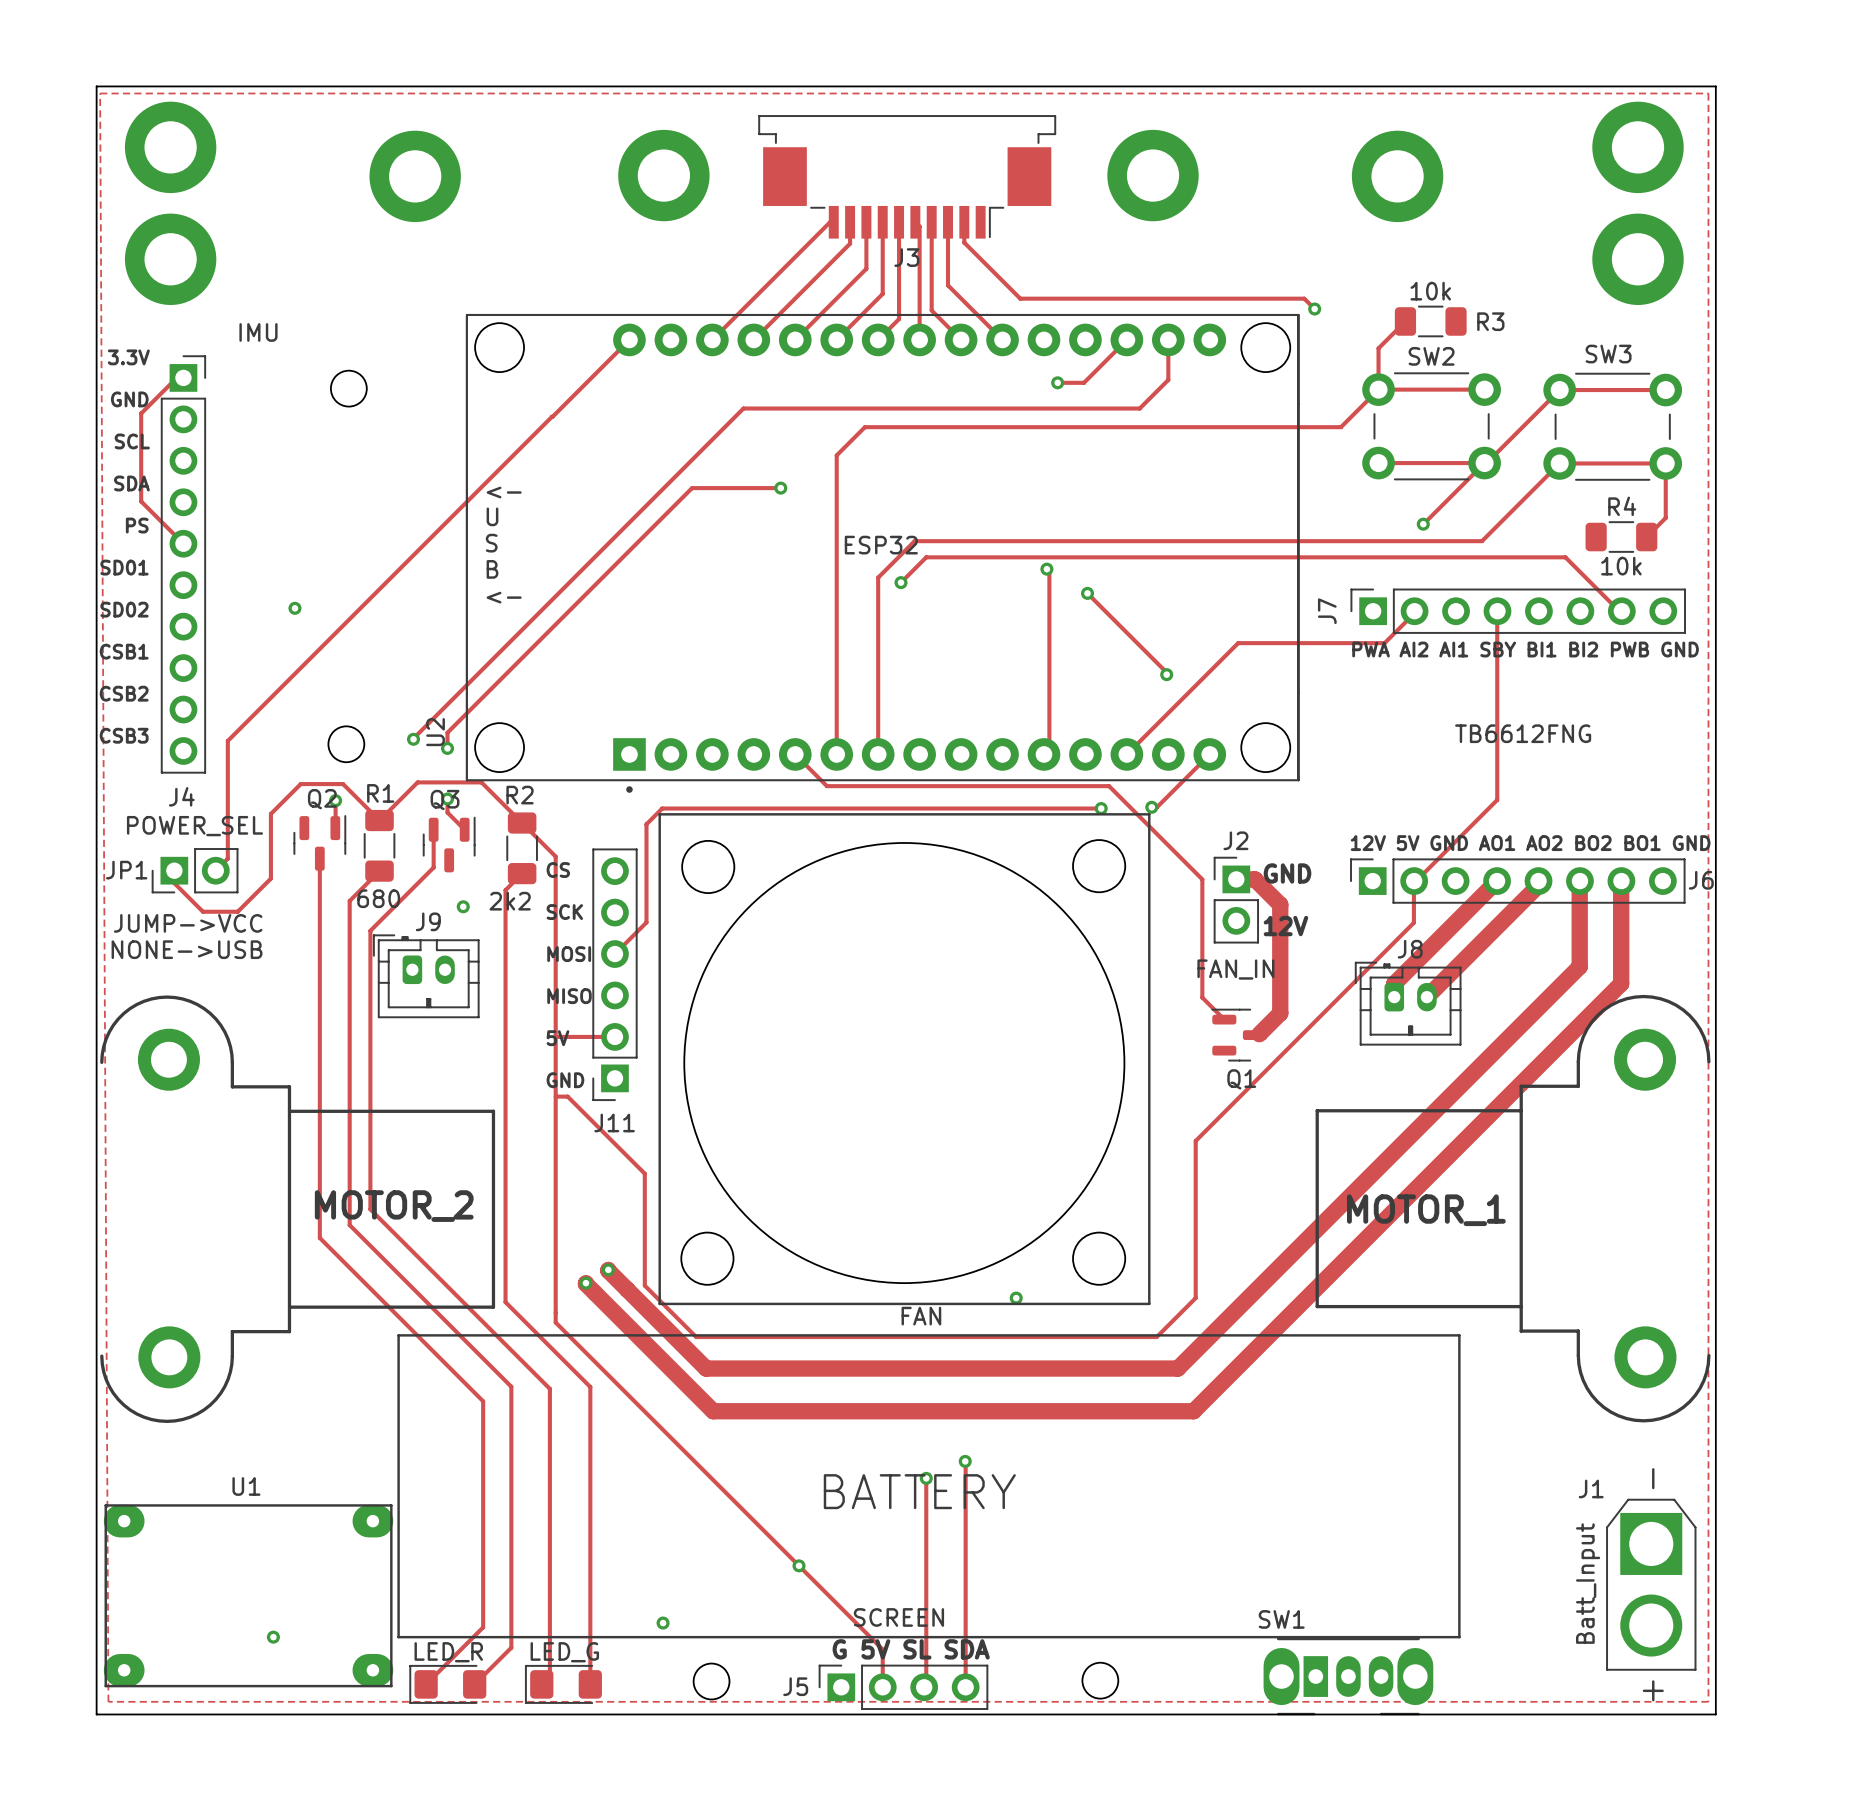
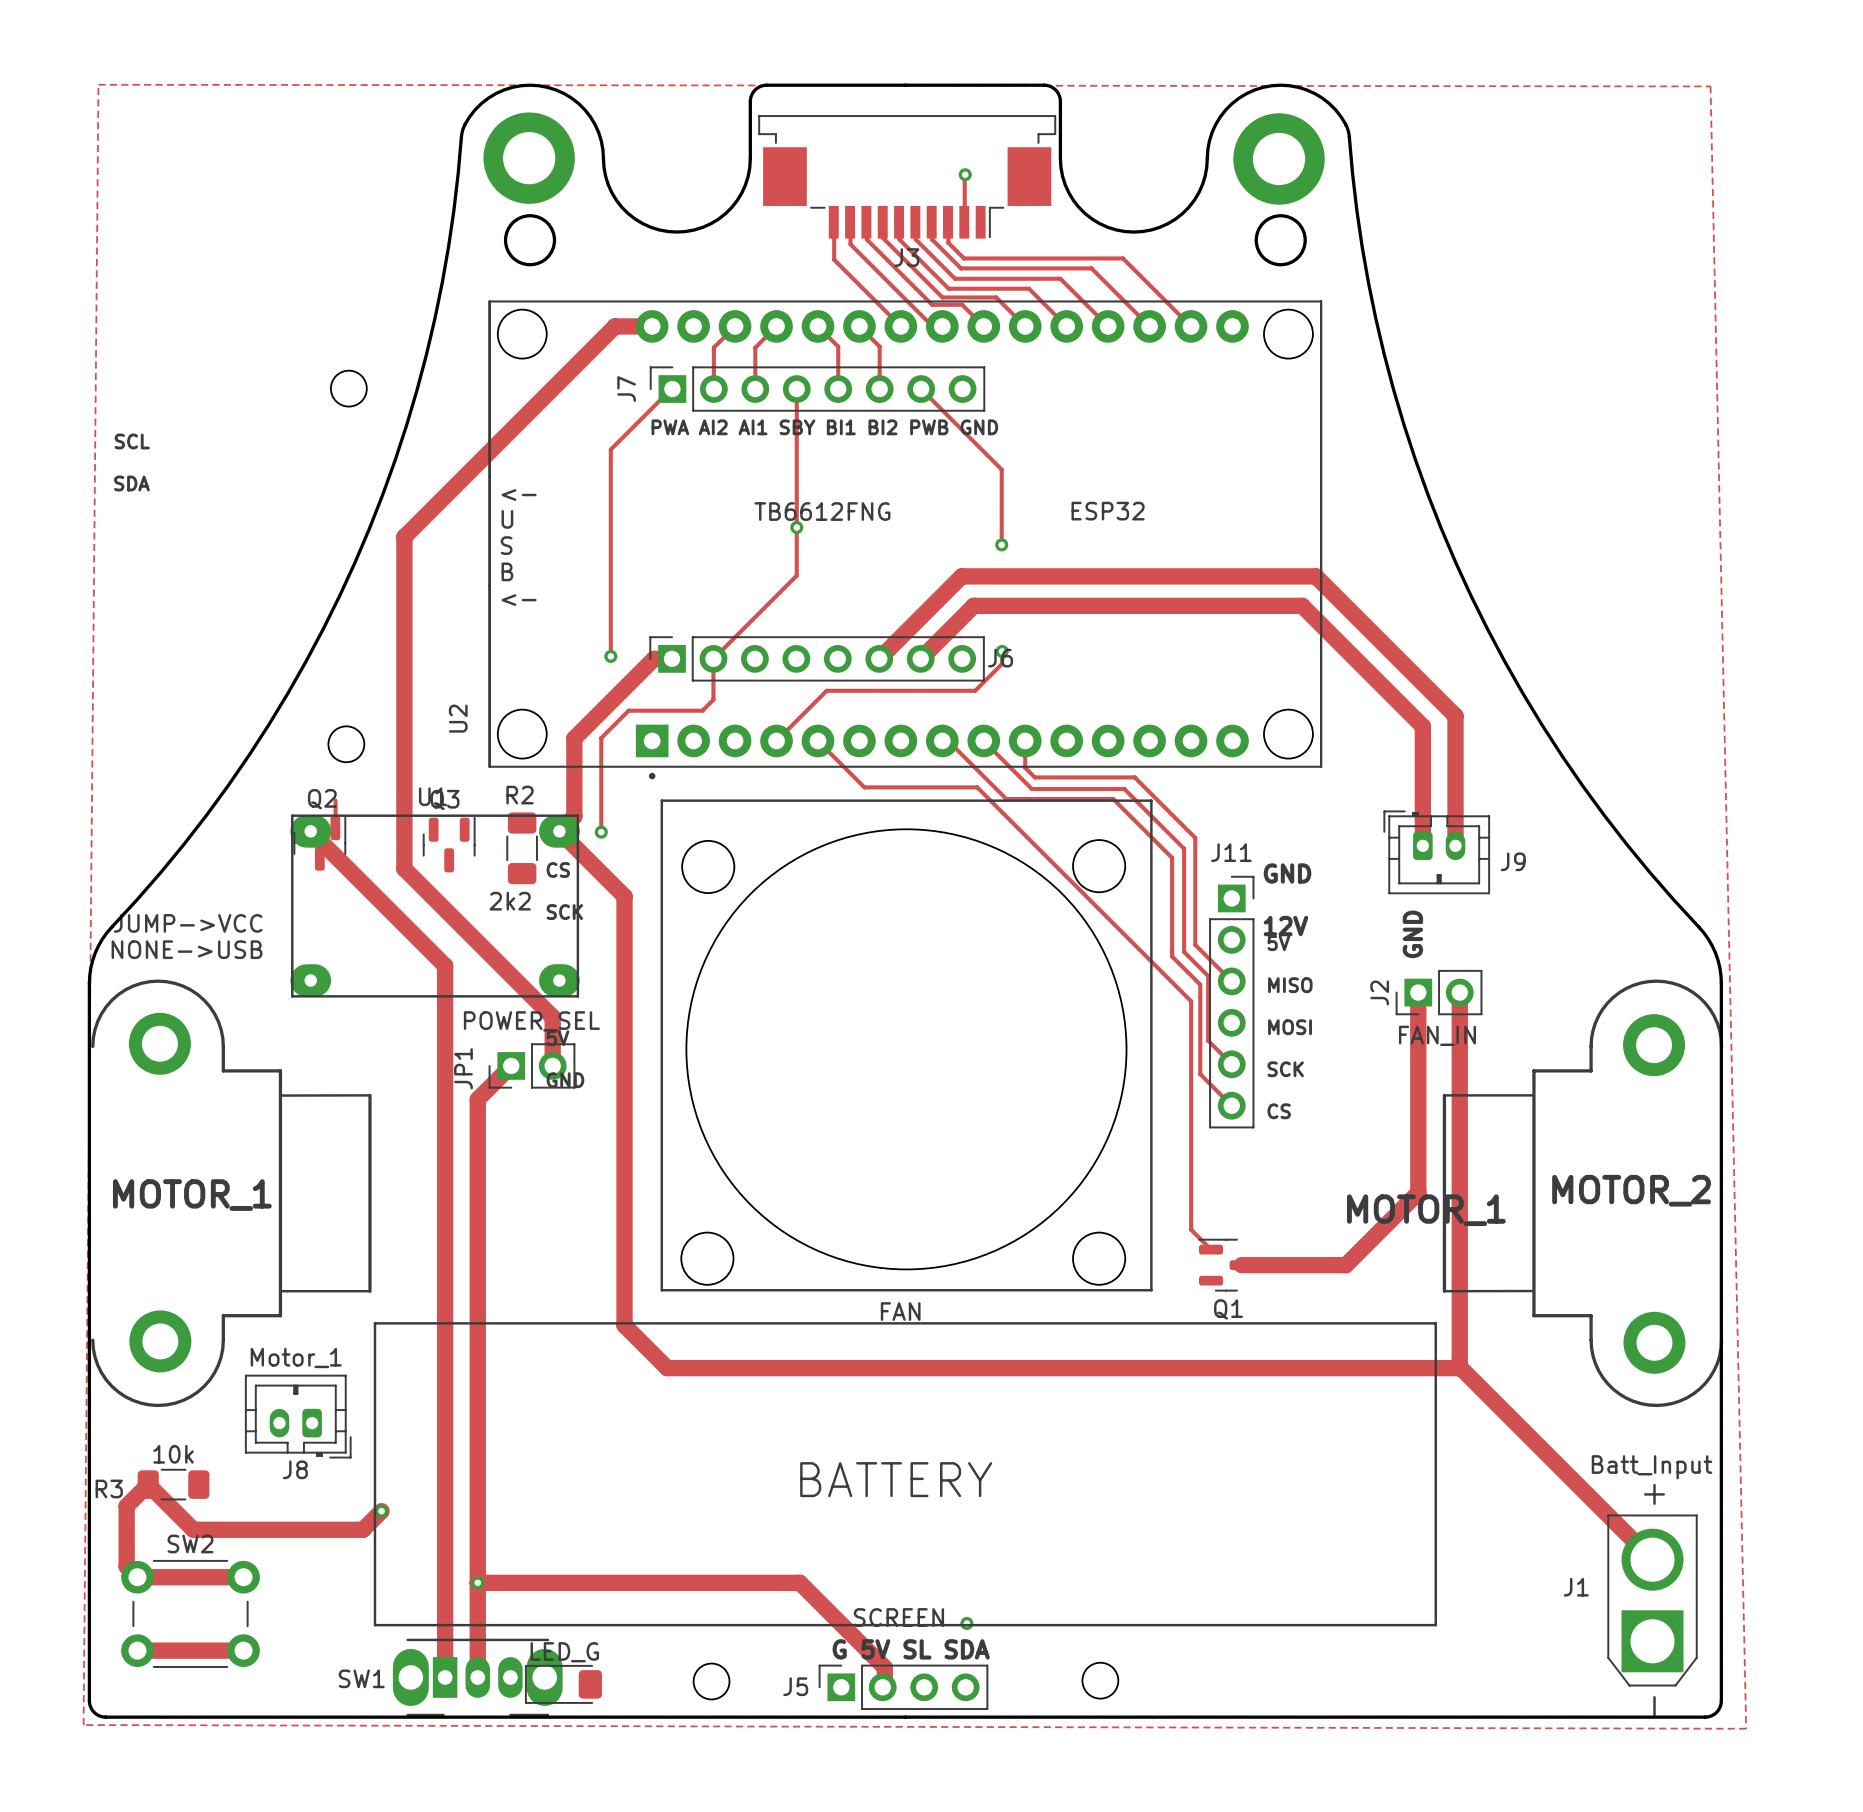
board edge: (96, 86) (1715, 86) (1715, 1714) (96, 1714) (96, 86) -> (766, 85) (756, 88) (750, 97) (749, 167) (741, 192) (731, 207) (718, 219) (702, 227) (685, 231) (668, 231) (650, 227) (635, 219) (621, 207) (608, 184) (601, 141) (595, 124) (578, 103) (564, 93) (538, 85) (512, 87) (488, 98) (469, 116) (461, 133) (448, 246) (426, 354) (395, 459) (355, 562) (306, 661) (249, 755) (184, 844) (106, 932) (95, 953) (89, 983) (89, 1700) (91, 1708) (97, 1714) (105, 1717) (1705, 1717) (1713, 1714) (1719, 1707) (1721, 1700) (1719, 967) (1715, 953) (1703, 932) (1626, 844) (1561, 755) (1504, 661) (1455, 562) (1415, 459) (1384, 354) (1362, 246) (1348, 133) (1345, 124) (1329, 103) (1306, 89) (1280, 85) (1263, 87) (1246, 93) (1231, 103) (1215, 124) (1209, 141) (1202, 184) (1188, 207) (1175, 219) (1159, 227) (1142, 231) (1124, 231) (1107, 227) (1092, 219) (1078, 207) (1068, 192) (1060, 167) (1060, 97) (1056, 91) (1049, 86) (766, 85)
zone outline: (100, 93) (108, 1701) (1708, 1701) (1708, 93) (100, 93) -> (98, 84) (83, 1725) (1746, 1728) (1710, 86) (98, 84)
part: (170, 147) -> none
part: (1638, 147) -> none
part: none -> (529, 158)
part: none -> (1279, 158)
track: none -> (965, 174) (964, 223)
via: none -> (965, 174)
part: (663, 175) -> none
part: (1153, 175) -> none
part: (415, 176) -> none
part: (1397, 176) -> none
round board edge: none -> [503, 214, 557, 267]
round board edge: none -> [1254, 214, 1307, 267]
track: (833, 222) (830, 222) (712, 339) -> none
track: (850, 222) (850, 243) (753, 339) -> none
track: (866, 222) (866, 268) (795, 339) -> none
track: (882, 222) (882, 293) (836, 339) -> none
track: (899, 222) (899, 319) (878, 339) -> none
track: (915, 222) (919, 226) (919, 339) -> none
track: (931, 222) (931, 310) (961, 339) -> none
track: (948, 222) (948, 285) (1002, 339) -> none
track: (964, 222) (964, 242) (1020, 298) (1304, 298) (1314, 309) -> none
track: none -> (834, 223) (834, 259) (900, 326)
track: none -> (850, 223) (850, 244) (932, 326) (942, 326)
track: none -> (866, 223) (866, 239) (932, 304) (962, 304) (983, 326)
track: none -> (883, 223) (883, 238) (942, 297) (996, 297) (1025, 326)
track: none -> (899, 223) (899, 239) (948, 288) (1028, 288) (1066, 326)
track: none -> (915, 223) (915, 239) (955, 278) (1060, 278) (1108, 326)
track: none -> (932, 223) (932, 239) (960, 268) (1091, 268) (1149, 326)
track: none -> (948, 223) (948, 242) (964, 258) (1123, 258) (1191, 326)
part: (170, 259) -> none
part: (1638, 259) -> none
via: (1314, 309) -> none
track: (1405, 321) (1378, 348) (1378, 389) -> none
R3 position: (1430, 321) -> (173, 1484)
R3 name position: R3 (1490, 321) -> R3 (109, 1488)
track: none -> (652, 326) (614, 326) (404, 537) (404, 868) (552, 1017) (552, 1065)
track: none -> (735, 326) (713, 347) (713, 389)
track: none -> (776, 326) (755, 347) (755, 389)
track: none -> (817, 326) (838, 346) (838, 389)
track: none -> (859, 326) (879, 346) (879, 389)
track: (629, 339) (227, 740) (227, 858) (215, 870) -> none
track: (1126, 339) (1084, 382) (1057, 382) -> none
track: (1168, 339) (1168, 379) (1139, 408) (743, 408) (413, 739) -> none
text: 3.3V (128, 357) -> none
track: (183, 377) (176, 377) (141, 413) (141, 501) (183, 543) -> none
via: (1057, 382) -> none
track: none -> (672, 389) (610, 449) (610, 656)
track: none -> (796, 389) (796, 575) (713, 658) (713, 699) (702, 710) (628, 710) (601, 738) (601, 832)
track: none -> (921, 389) (1001, 469) (1001, 544)
track: (1378, 389) (1340, 427) (864, 427) (836, 455) (836, 754) -> none
track: (1378, 389) (1484, 389) -> none
track: (1665, 390) (1559, 390) (1486, 463) (1378, 463) -> none
text: GND (129, 399) -> none
SW2 position: (1431, 426) -> (190, 1613)
SW3: (1612, 426) -> none
text: none -> PWA AI2 AI1 SBY BI1 BI2 PWB GND (824, 427)
track: (1484, 463) (1423, 524) -> none
track: (780, 488) (692, 488) (447, 732) (447, 748) -> none
via position: (780, 488) -> (796, 527)
text position: <- (504, 492) -> <- (519, 495)
text: none -> TB6612FNG (822, 511)
text position: U (492, 516) -> U (507, 519)
via: (1423, 524) -> none
text: PS (137, 525) -> none
R4: 10k (1621, 537) -> none
track: (1646, 537) (1665, 517) (1665, 463) (1559, 463) (1481, 541) (914, 541) (878, 577) (878, 754) -> none
text position: S (491, 543) -> S (506, 545)
via: none -> (1001, 544)
text position: ESP32 (881, 545) -> ESP32 (1108, 511)
U2 position: (882, 553) -> (905, 539)
J4: IMU (183, 564) -> none
text: SD01 (124, 567) -> none
text position: B (492, 569) -> B (507, 571)
track: (1046, 569) (1049, 571) (1049, 749) (1043, 754) -> none
via: (1046, 569) -> none
track: (900, 582) (926, 557) (1565, 557) (1621, 613) -> none
via: (900, 582) -> none
track: (1087, 593) (1166, 674) -> none
via: (1087, 593) -> none
text position: <- (504, 597) -> <- (519, 600)
via: (294, 608) -> none
text: SD02 (124, 609) -> none
J7 position: (1518, 611) -> (817, 389)
track: (1414, 613) (1384, 643) (1238, 643) (1126, 754) -> none
track: (1497, 613) (1497, 799) (1413, 883) (1413, 922) (1195, 1140) (1195, 1298) (1156, 1337) (696, 1337) (644, 1285) (644, 1173) (567, 1096) (555, 1096) -> none
text: PWA AI2 AI1 SBY BI1 BI2 PWB GND (1525, 649) -> none
text: CSB1 (124, 651) -> none
track: none -> (1002, 651) (1002, 663) (975, 690) (826, 690) (776, 740)
via: none -> (1002, 651)
via: none -> (610, 656)
track: none -> (672, 658) (653, 658) (574, 738) (574, 816) (559, 831) (624, 896) (624, 1325) (667, 1368) (1459, 1366)
track: none -> (879, 658) (961, 576) (1315, 576) (1455, 715) (1455, 845)
track: none -> (920, 658) (973, 605) (1302, 605) (1422, 726) (1422, 845)
via: (1166, 674) -> none
text: CSB2 (124, 693) -> none
text: TB6612FNG (1523, 733) -> none
text: CSB3 (124, 735) -> none
via: (413, 739) -> none
track: none -> (817, 740) (864, 787) (977, 787) (1191, 1001) (1191, 1229) (1211, 1249)
track: none -> (942, 740) (948, 740) (1006, 798) (1113, 798) (1172, 857) (1172, 956) (1200, 984) (1200, 1074) (1231, 1105)
track: none -> (983, 740) (1031, 789) (1124, 789) (1184, 848) (1184, 951) (1208, 975) (1208, 1040) (1231, 1064)
track: none -> (1025, 740) (1025, 767) (1034, 777) (1134, 777) (1195, 837) (1195, 944) (1231, 981)
via: (447, 748) -> none
track: (795, 754) (826, 786) (1109, 786) (1202, 879) (1202, 997) (1224, 1019) -> none
track: (1209, 754) (1156, 807) (1151, 807) -> none
track: (447, 798) (447, 812) (464, 829) -> none
via: (447, 798) -> none
via: (335, 800) -> none
via: (1151, 807) -> none
track: (1101, 808) (662, 808) (646, 824) (646, 922) (614, 954) -> none
via: (1101, 808) -> none
line: (659, 814) (1149, 814) (1149, 1303) (659, 1303) (659, 814) -> (661, 800) (1151, 800) (1151, 1290) (661, 1290) (661, 800)
track: (433, 829) (433, 867) (370, 930) (370, 1209) (549, 1388) (549, 1676) (541, 1684) -> none
track: none -> (310, 831) (445, 965) (445, 1677)
via: none -> (601, 832)
text: 12V 5V GND AO1 AO2 BO2 BO1 GND (1530, 843) -> none
R1: 680 (379, 845) -> none
track: (319, 858) (319, 1237) (483, 1401) (483, 1627) (426, 1684) -> none
JP1 name rotation: 0° (126, 870) -> 90° counterclockwise (463, 1068)
track: (174, 870) (174, 883) (202, 911) (237, 911) (270, 878) (270, 813) (300, 784) (343, 784) (379, 820) (417, 782) (481, 782) (555, 856) (555, 1322) (882, 1649) (882, 1687) -> none
JP1 position: (195, 870) -> (531, 1065)
track: (379, 871) (349, 900) (349, 1225) (511, 1386) (511, 1647) (474, 1684) -> none
track: (522, 873) (505, 890) (505, 1302) (590, 1387) (590, 1684) -> none
track: (1236, 879) (1254, 879) (1280, 904) (1280, 1013) (1259, 1034) (1254, 1035) -> none
track: (1497, 881) (1394, 983) (1394, 997) -> none
J6 position: (1517, 881) -> (817, 658)
track: (1538, 881) (1538, 885) (1426, 997) -> none
track: (1579, 883) (1579, 966) (1177, 1368) (706, 1368) (608, 1269) -> none
track: (1621, 883) (1621, 983) (1193, 1411) (713, 1411) (585, 1283) -> none
J2 rotation: 0° (1236, 900) -> 90° counterclockwise (1439, 992)
J2 position: (1236, 900) -> (1439, 992)
via: (463, 906) -> none
J9 name position: J9 (428, 921) -> J9 (1513, 861)
text: none -> GND (1412, 934)
text: none -> 5V (1278, 943)
text: MOSI (569, 954) -> none
J11 rotation: 0° (614, 974) -> 180° (1231, 1002)
J11 position: (614, 974) -> (1231, 1002)
J9 position: (426, 976) -> (1436, 852)
text: none -> MISO (1290, 985)
track: none -> (1418, 992) (1418, 1192) (1345, 1265) (1241, 1265)
track: none -> (1459, 992) (1459, 1366)
text: MISO (569, 996) -> none
J8 rotation: 0° (1408, 1003) -> 180° (298, 1416)
J8 position: (1408, 1003) -> (298, 1416)
text: none -> MOSI (1290, 1027)
Q1 position: (1239, 1035) -> (1225, 1265)
track: (557, 1036) (614, 1036) -> none
line: none -> (92, 1046) (95, 1029) (101, 1013) (118, 994) (141, 983) (166, 981) (183, 986) (197, 994) (214, 1013) (222, 1037) (223, 1070) (280, 1070) (280, 1315) (223, 1315) (222, 1348) (214, 1372) (197, 1391) (183, 1400) (166, 1404) (141, 1403) (118, 1391) (101, 1372) (95, 1357) (92, 1340)
line: none -> (1721, 1046) (1719, 1030) (1714, 1016) (1699, 997) (1679, 985) (1664, 981) (1648, 981) (1626, 988) (1613, 997) (1602, 1009) (1592, 1030) (1591, 1070) (1533, 1070) (1533, 1315) (1591, 1315) (1592, 1355) (1602, 1377) (1613, 1389) (1626, 1397) (1648, 1404) (1671, 1403) (1686, 1397) (1699, 1389) (1714, 1370) (1719, 1355) (1721, 1340)
part position: (168, 1059) -> (159, 1043)
part position: (1645, 1059) -> (1654, 1045)
line: (1708, 1061) (1703, 1036) (1689, 1015) (1676, 1005) (1660, 998) (1635, 997) (1610, 1005) (1597, 1015) (1587, 1029) (1578, 1053) (1578, 1086) (1521, 1086) (1521, 1331) (1578, 1331) (1578, 1364) (1587, 1388) (1597, 1401) (1610, 1412) (1635, 1420) (1660, 1418) (1683, 1407) (1700, 1388) (1706, 1372) (1708, 1355) -> none
line: (101, 1062) (106, 1039) (113, 1025) (123, 1013) (143, 1001) (159, 997) (174, 997) (197, 1004) (210, 1013) (220, 1025) (230, 1046) (232, 1086) (289, 1086) (289, 1331) (232, 1331) (230, 1371) (220, 1393) (210, 1404) (197, 1413) (174, 1420) (159, 1420) (143, 1417) (123, 1404) (109, 1386) (103, 1371) (101, 1356) -> none
round board edge position: (904, 1063) -> (906, 1049)
track: none -> (511, 1065) (477, 1099) (477, 1677)
text: none -> SCK (1285, 1069)
line: none -> (281, 1095) (369, 1095) (369, 1291) (281, 1291)
line: none -> (1533, 1095) (1444, 1095) (1444, 1291) (1533, 1291)
line: (1521, 1110) (1317, 1110) (1317, 1306) (1521, 1306) -> none
line: (289, 1111) (493, 1111) (493, 1307) (289, 1307) -> none
text: none -> CS (1279, 1111)
text: none -> MOTOR_2 (1631, 1190)
text: none -> MOTOR_1 (192, 1195)
text: MOTOR_2 (394, 1206) -> none
via: (608, 1269) -> none
via: (585, 1283) -> none
via: (1016, 1298) -> none
text position: FAN (921, 1316) -> FAN (900, 1311)
line: (398, 1335) (1459, 1335) (1459, 1637) (398, 1637) (398, 1335) -> (374, 1323) (1435, 1323) (1435, 1625) (374, 1625) (374, 1323)
part position: (169, 1357) -> (160, 1341)
part position: (1645, 1357) -> (1654, 1342)
J8 value: none -> Motor_1 (296, 1358)
track: none -> (1459, 1366) (1652, 1559)
track: (965, 1461) (965, 1687) -> none
via: (965, 1461) -> none
track: (926, 1478) (926, 1685) (924, 1687) -> none
via: (926, 1478) -> none
J1 name position: J1 (1591, 1488) -> J1 (1576, 1587)
text position: BATTERY (919, 1491) -> BATTERY (896, 1479)
track: none -> (381, 1511) (362, 1529) (193, 1529) (148, 1484) (126, 1506) (126, 1566) (137, 1577) (243, 1577)
via: none -> (381, 1511)
via: (799, 1565) -> none
track: none -> (477, 1582) (799, 1582) (884, 1667) (884, 1687)
via: none -> (477, 1582)
J1 value position: Batt_Input (1588, 1583) -> Batt_Input (1652, 1467)
J1 rotation: 0° (1651, 1584) -> 180° (1652, 1600)
U1 position: (248, 1595) -> (435, 906)
SW1 name position: SW1 (1281, 1619) -> SW1 (361, 1678)
via: (663, 1623) -> none
via: none -> (966, 1623)
via: (273, 1637) -> none
track: none -> (137, 1650) (243, 1650)
SW1 position: (1348, 1676) -> (477, 1677)
part: LED_R (447, 1684) -> none

